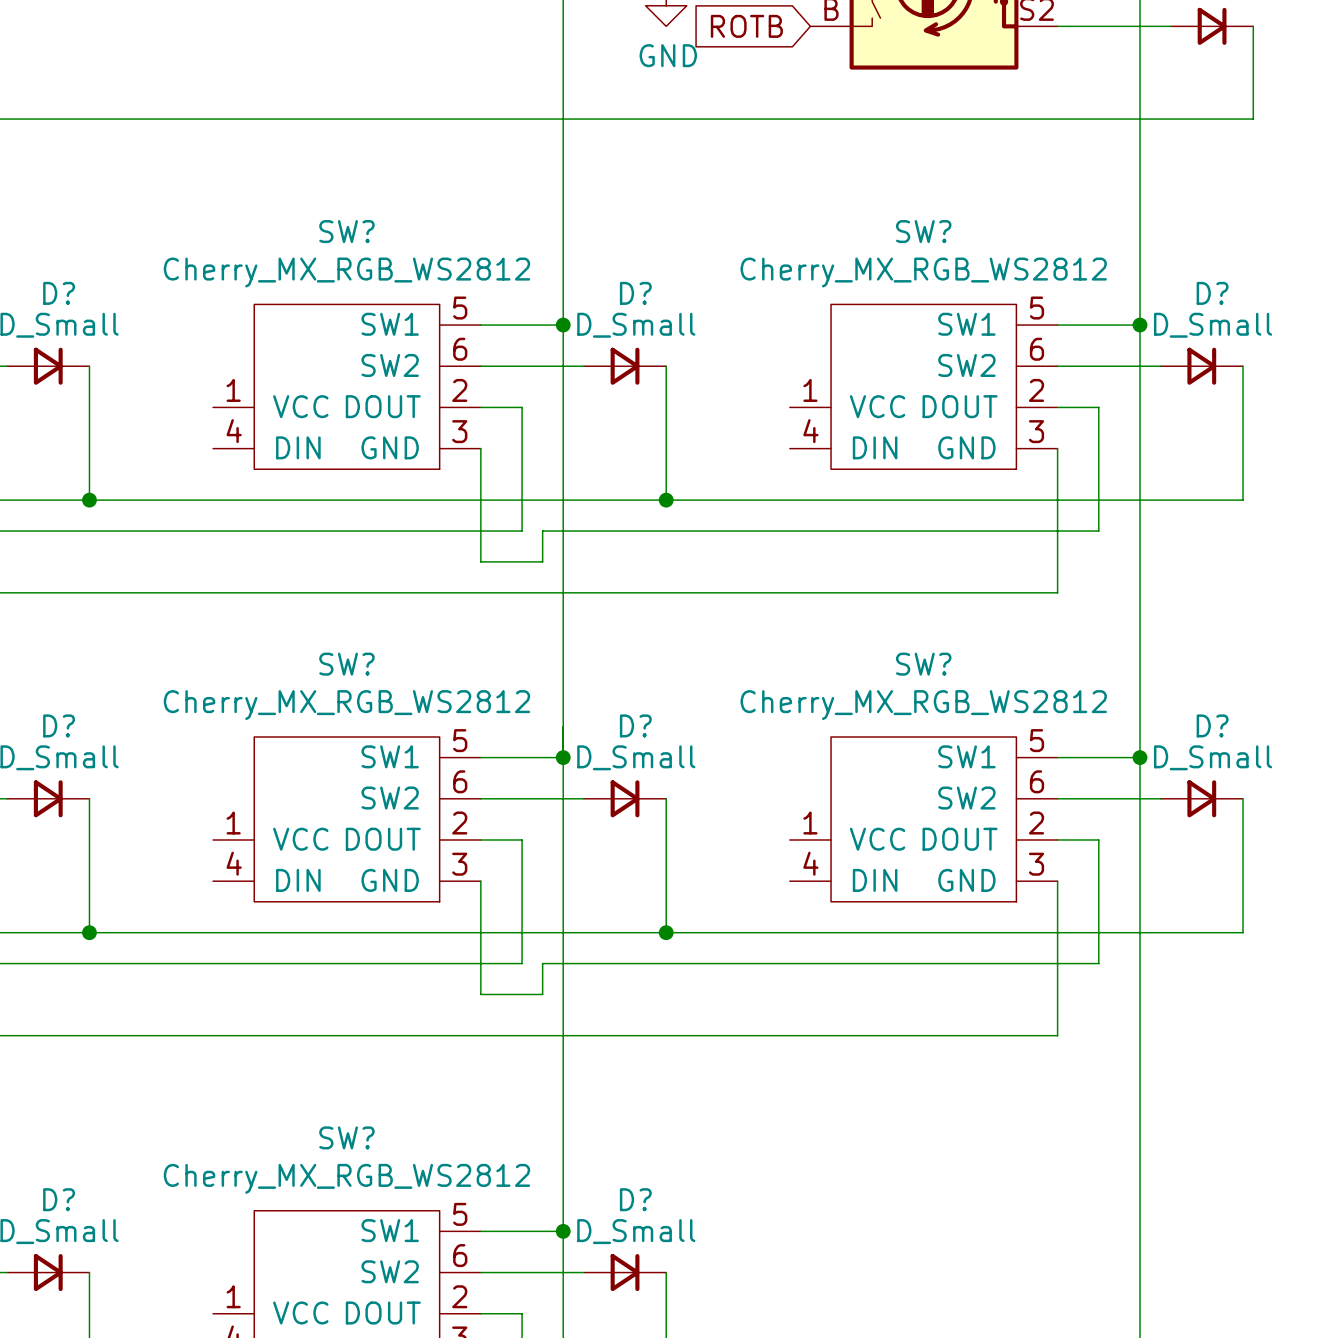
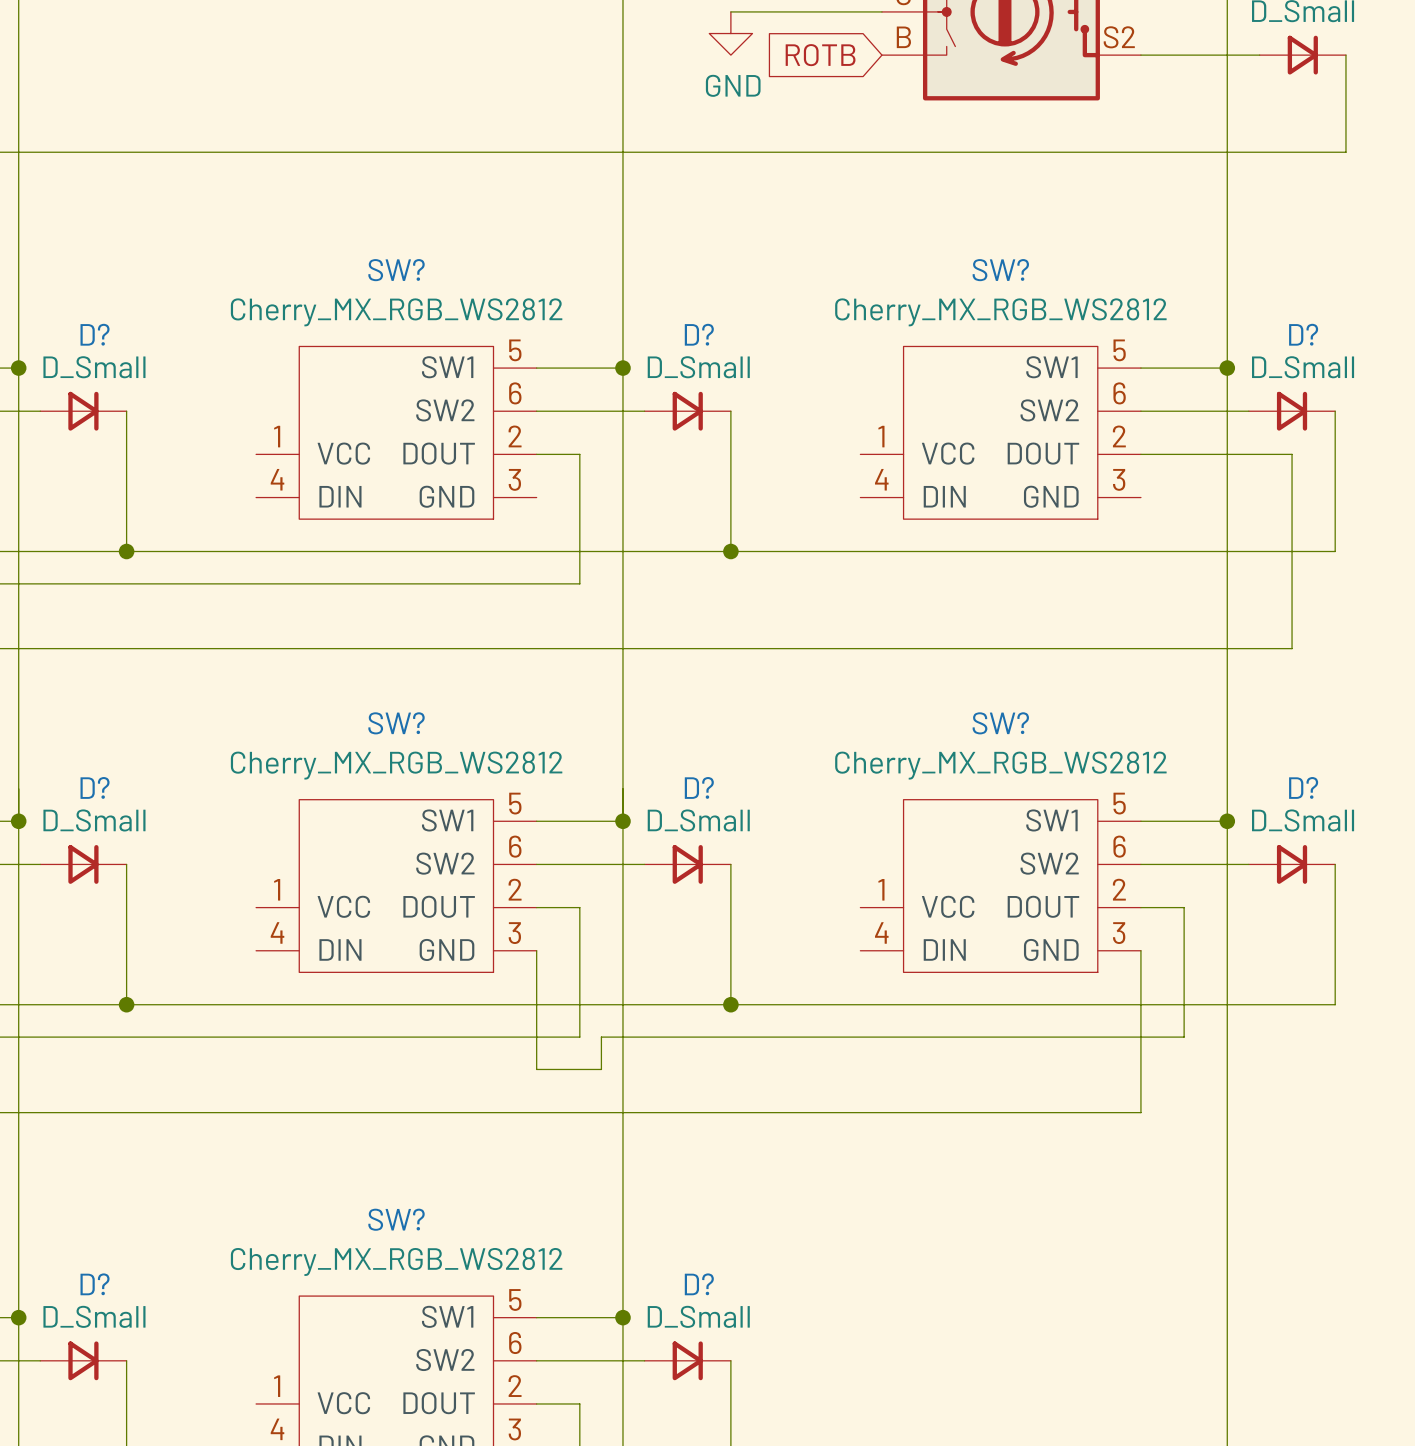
wire: (1098, 407) (1098, 531) (542, 531) (542, 561) (480, 561) (480, 448) -> none
wire: (1057, 448) (1057, 592) -> (1184, 454) (1292, 454) (1292, 648) (1140, 648)

